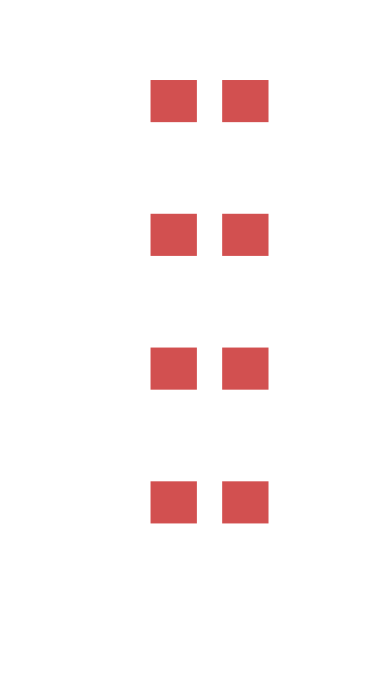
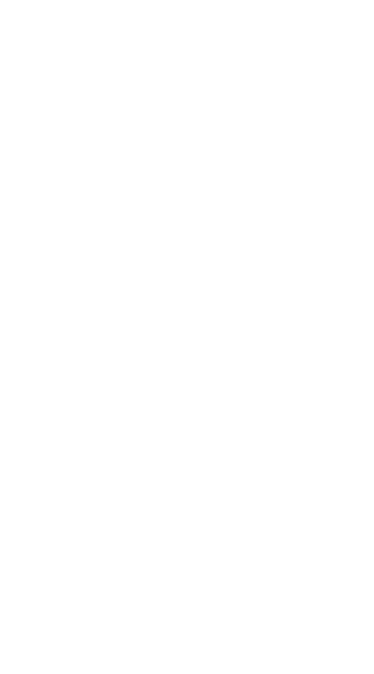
part: (209, 101) -> none
part: (209, 234) -> none
part: (209, 368) -> none
part: (209, 502) -> none

